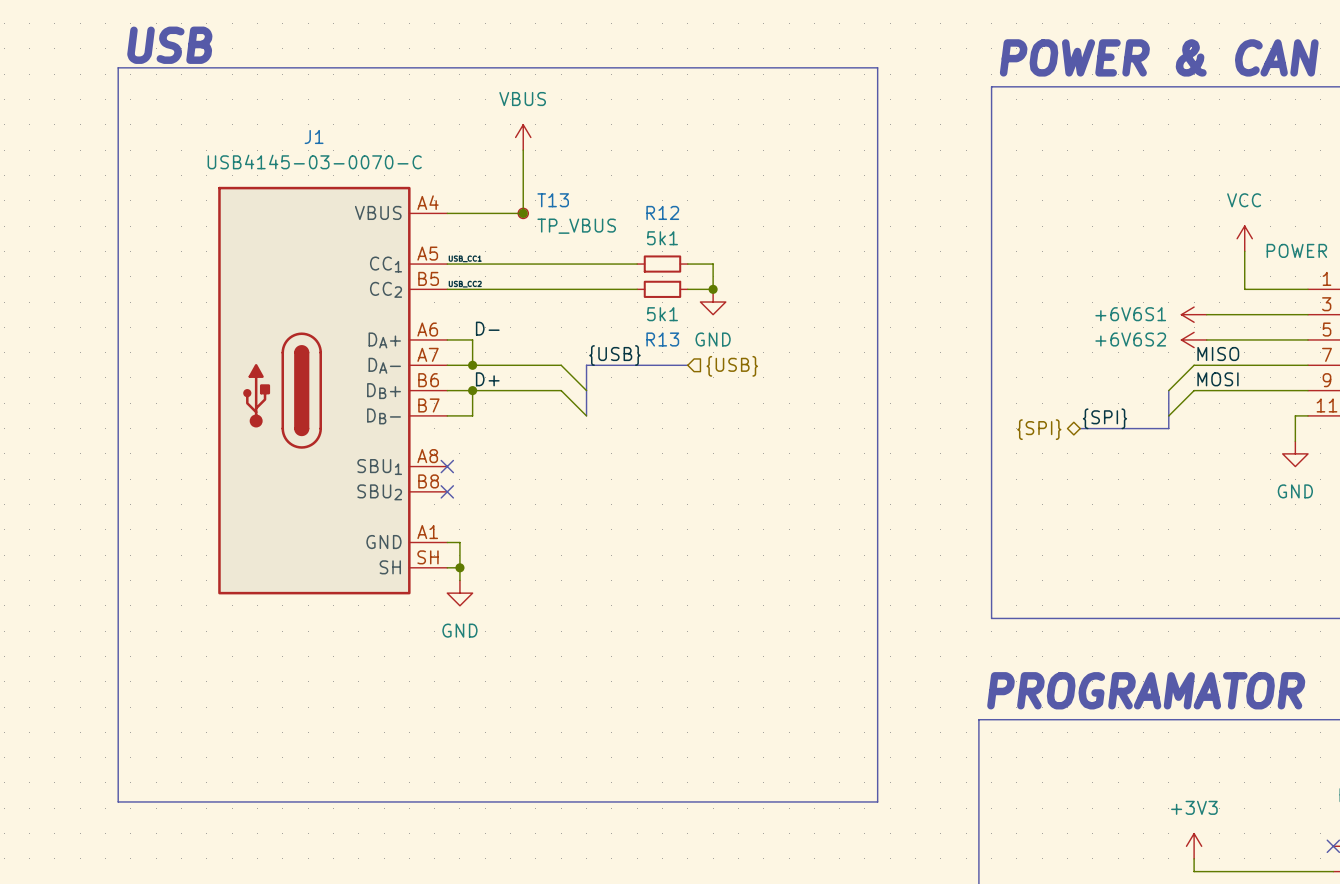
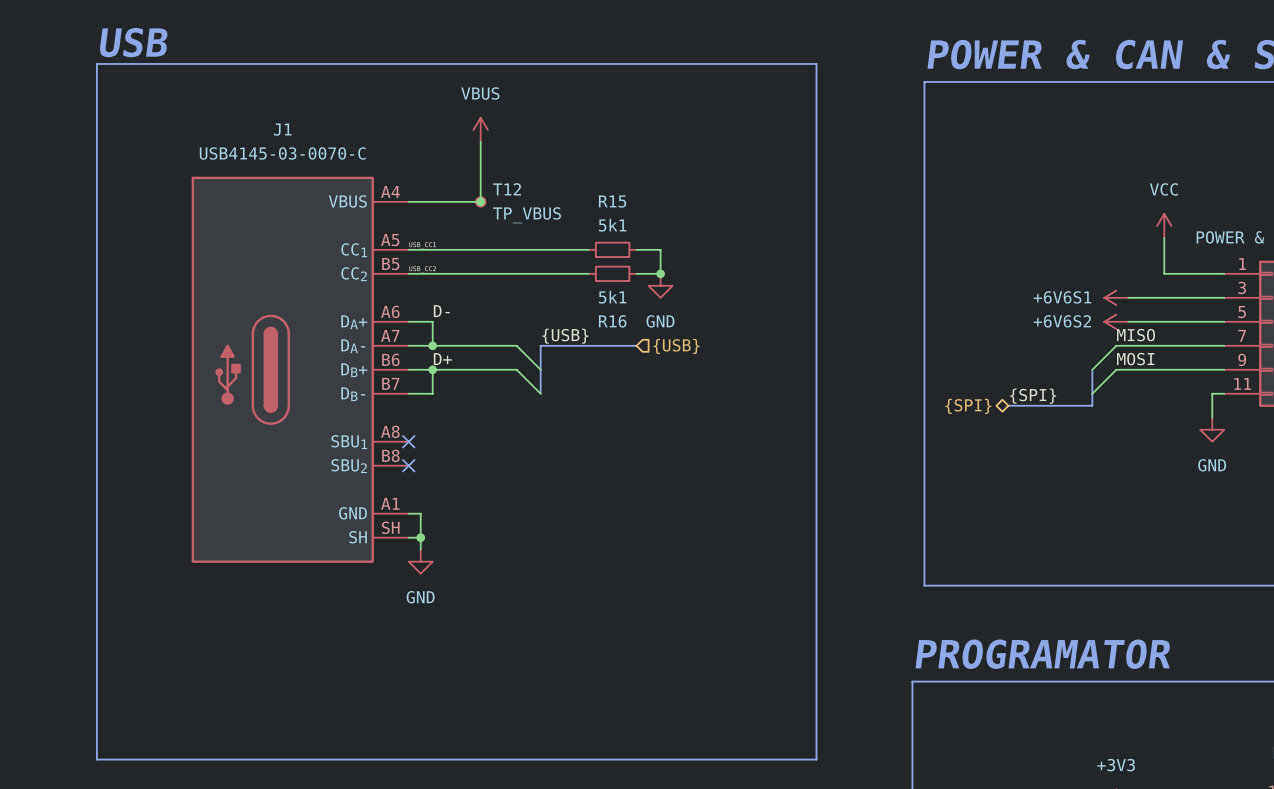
T13 name: T13 (553, 200) -> T12 (507, 189)
R12 name: R12 (662, 212) -> R15 (612, 201)
R13 name: R13 (662, 339) -> R16 (612, 321)

